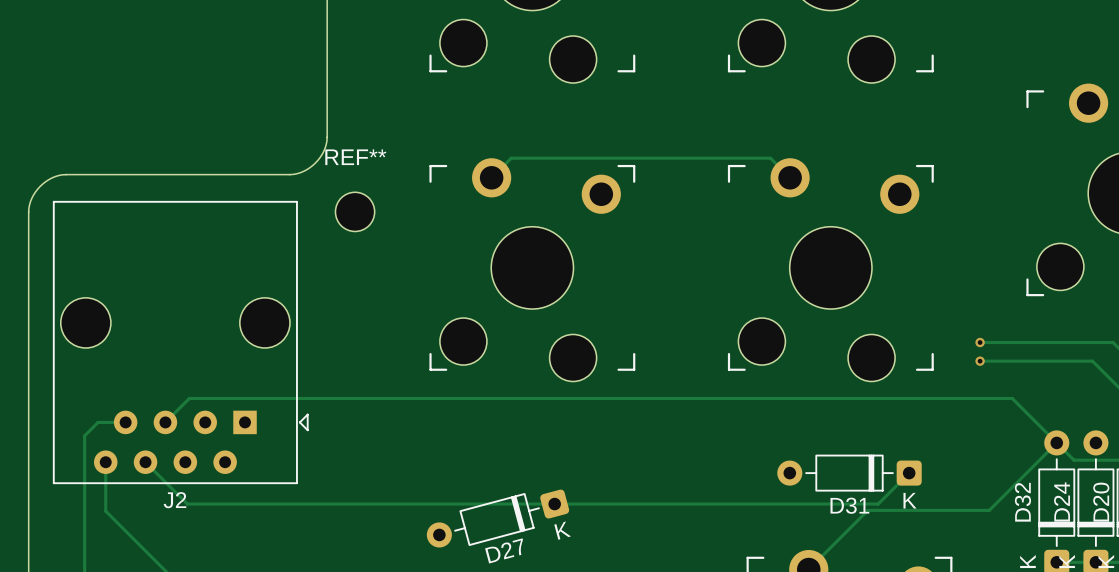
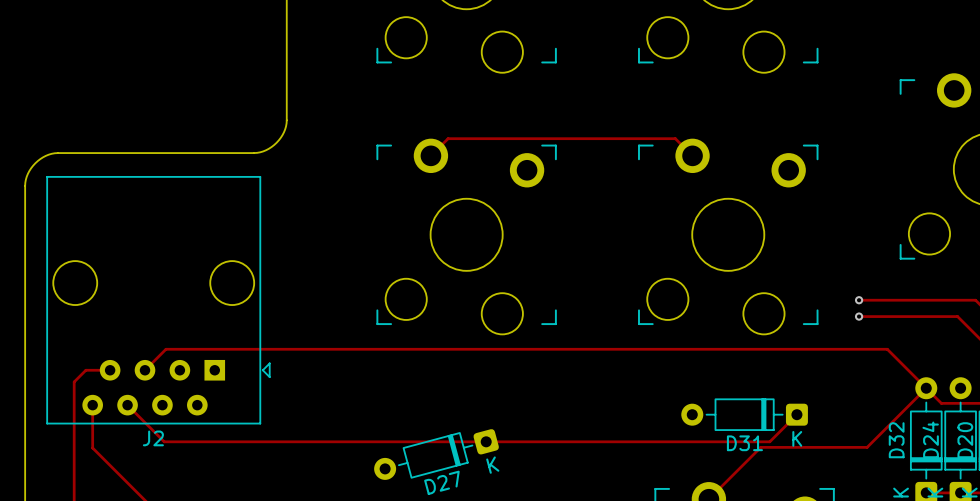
REF**: (355, 211) -> none

